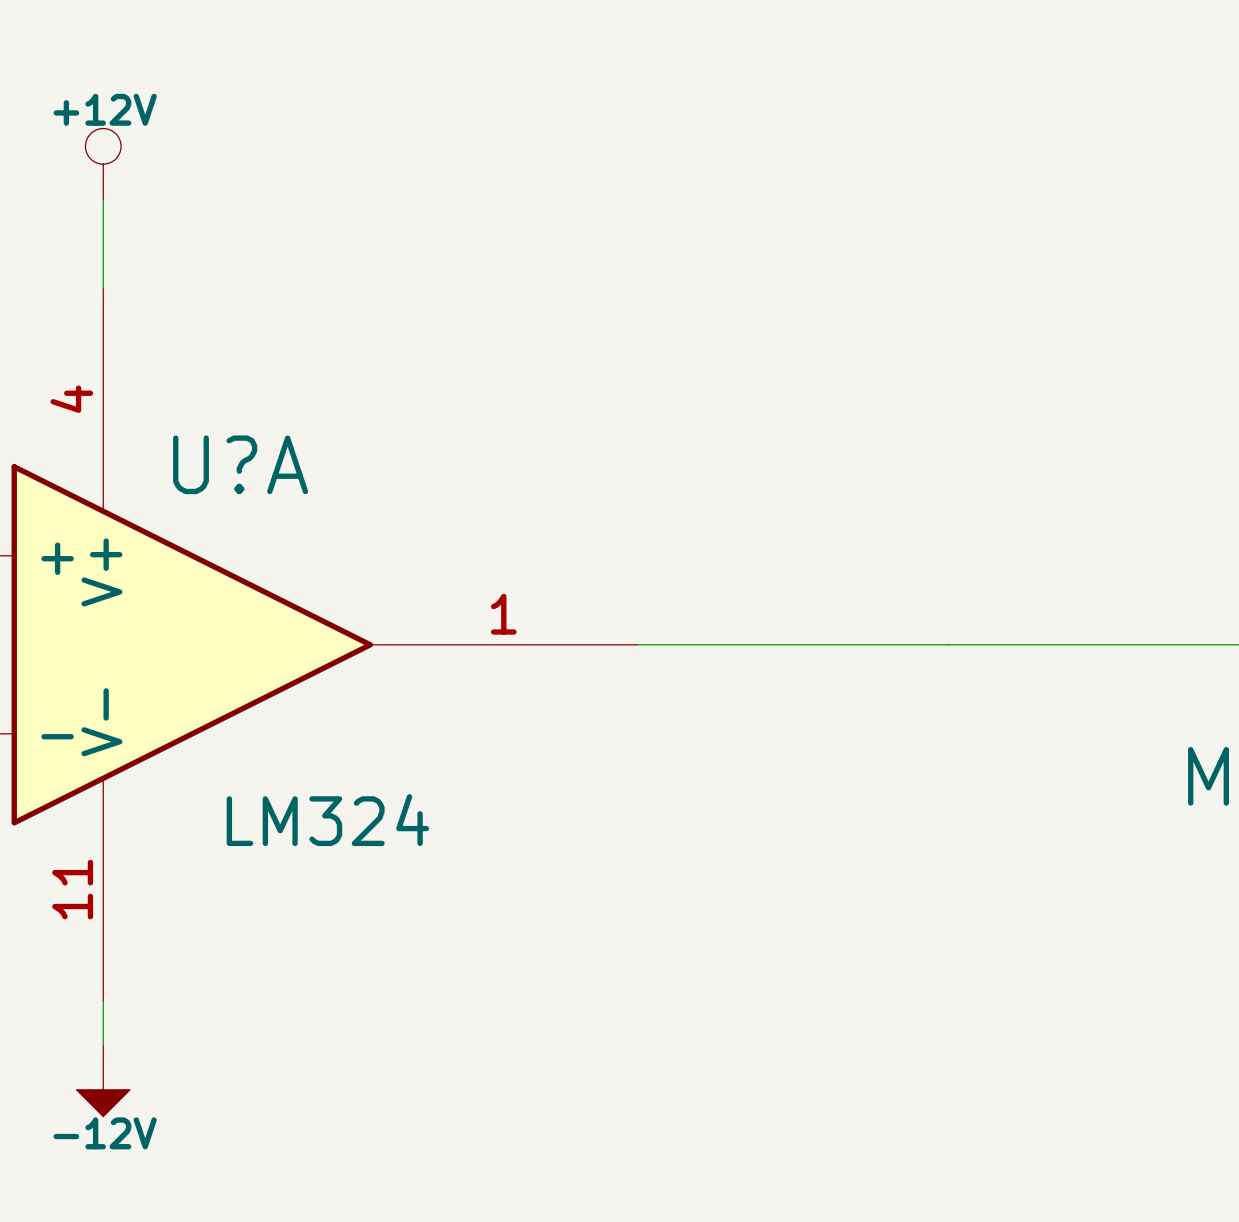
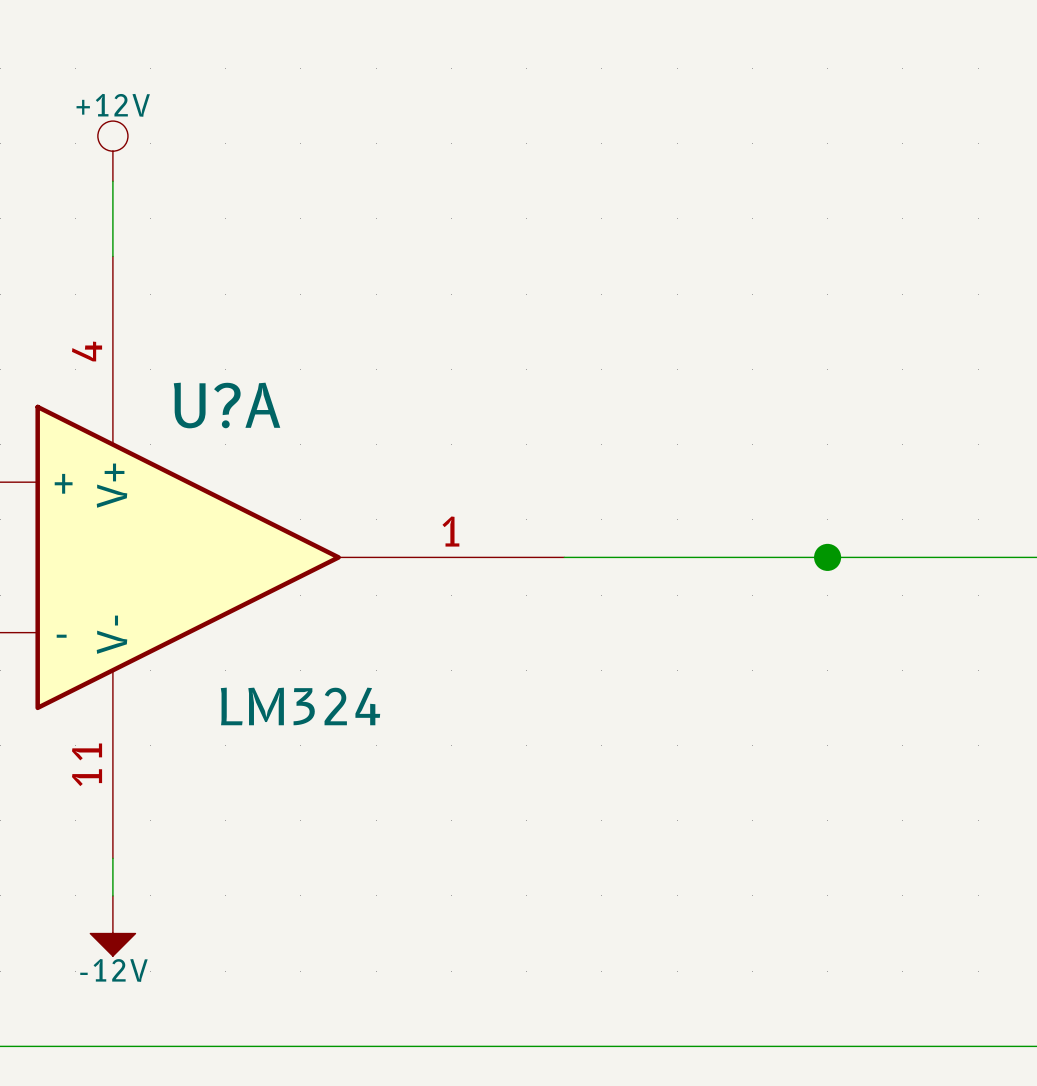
junction: none -> (827, 557)

